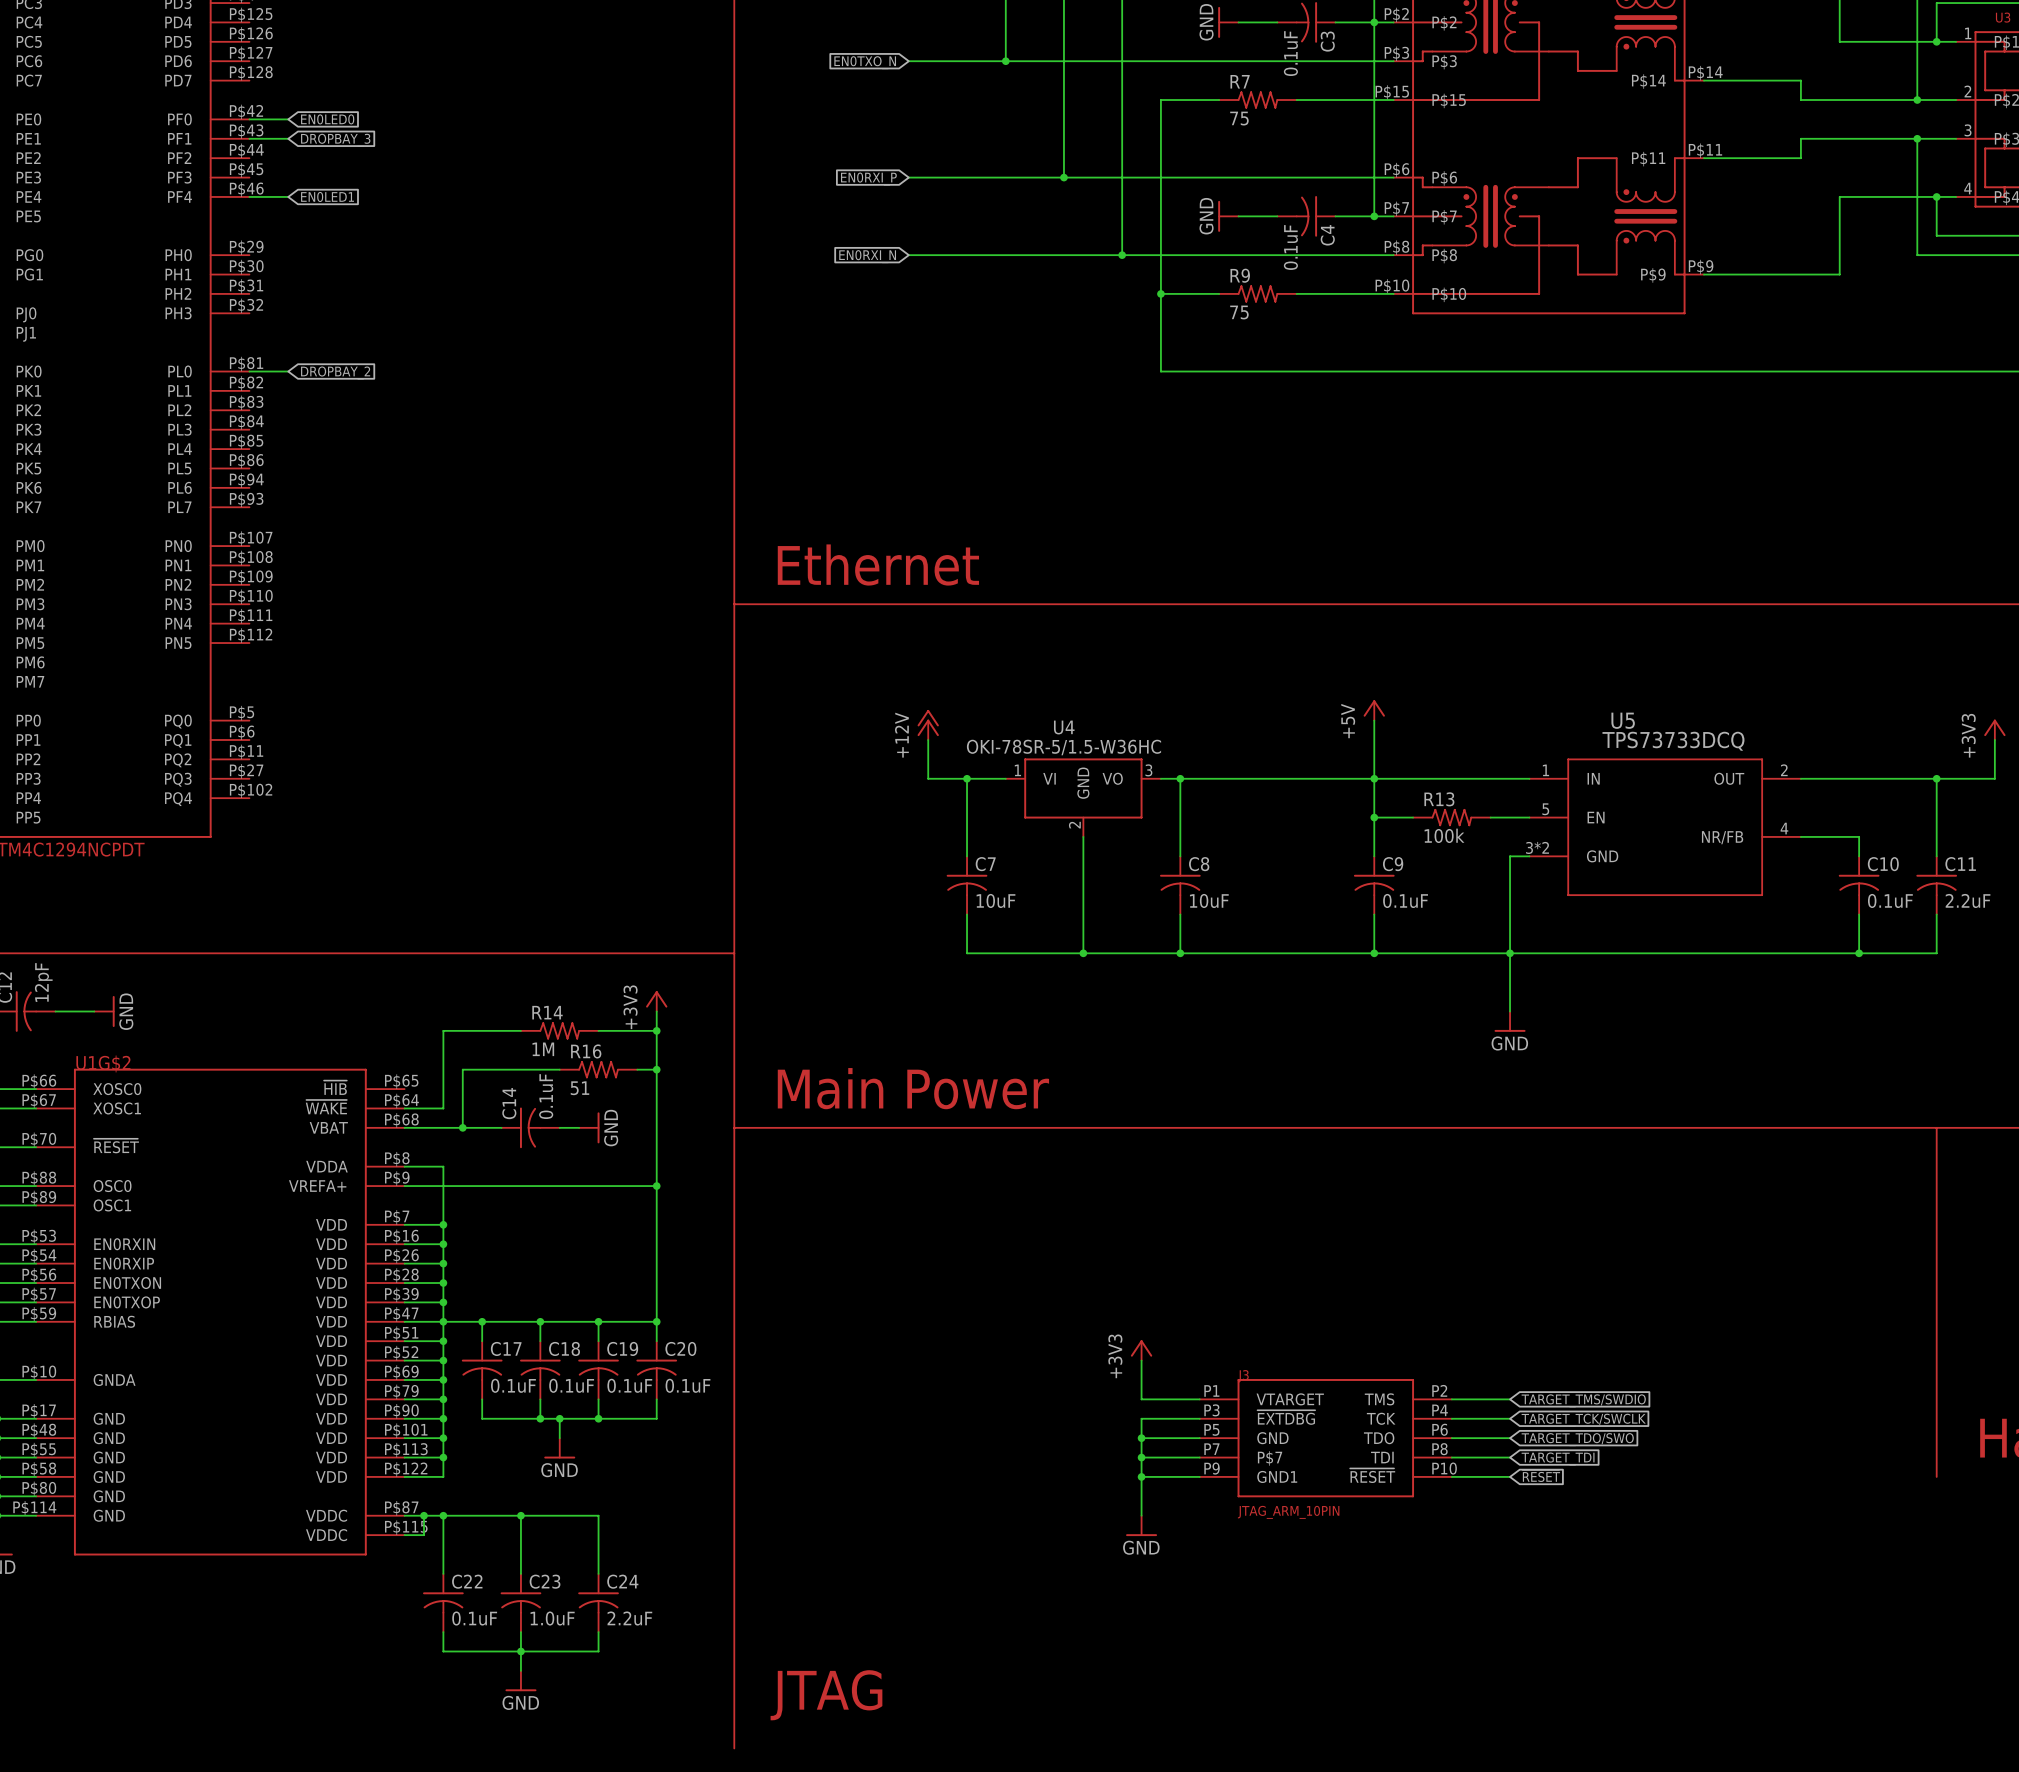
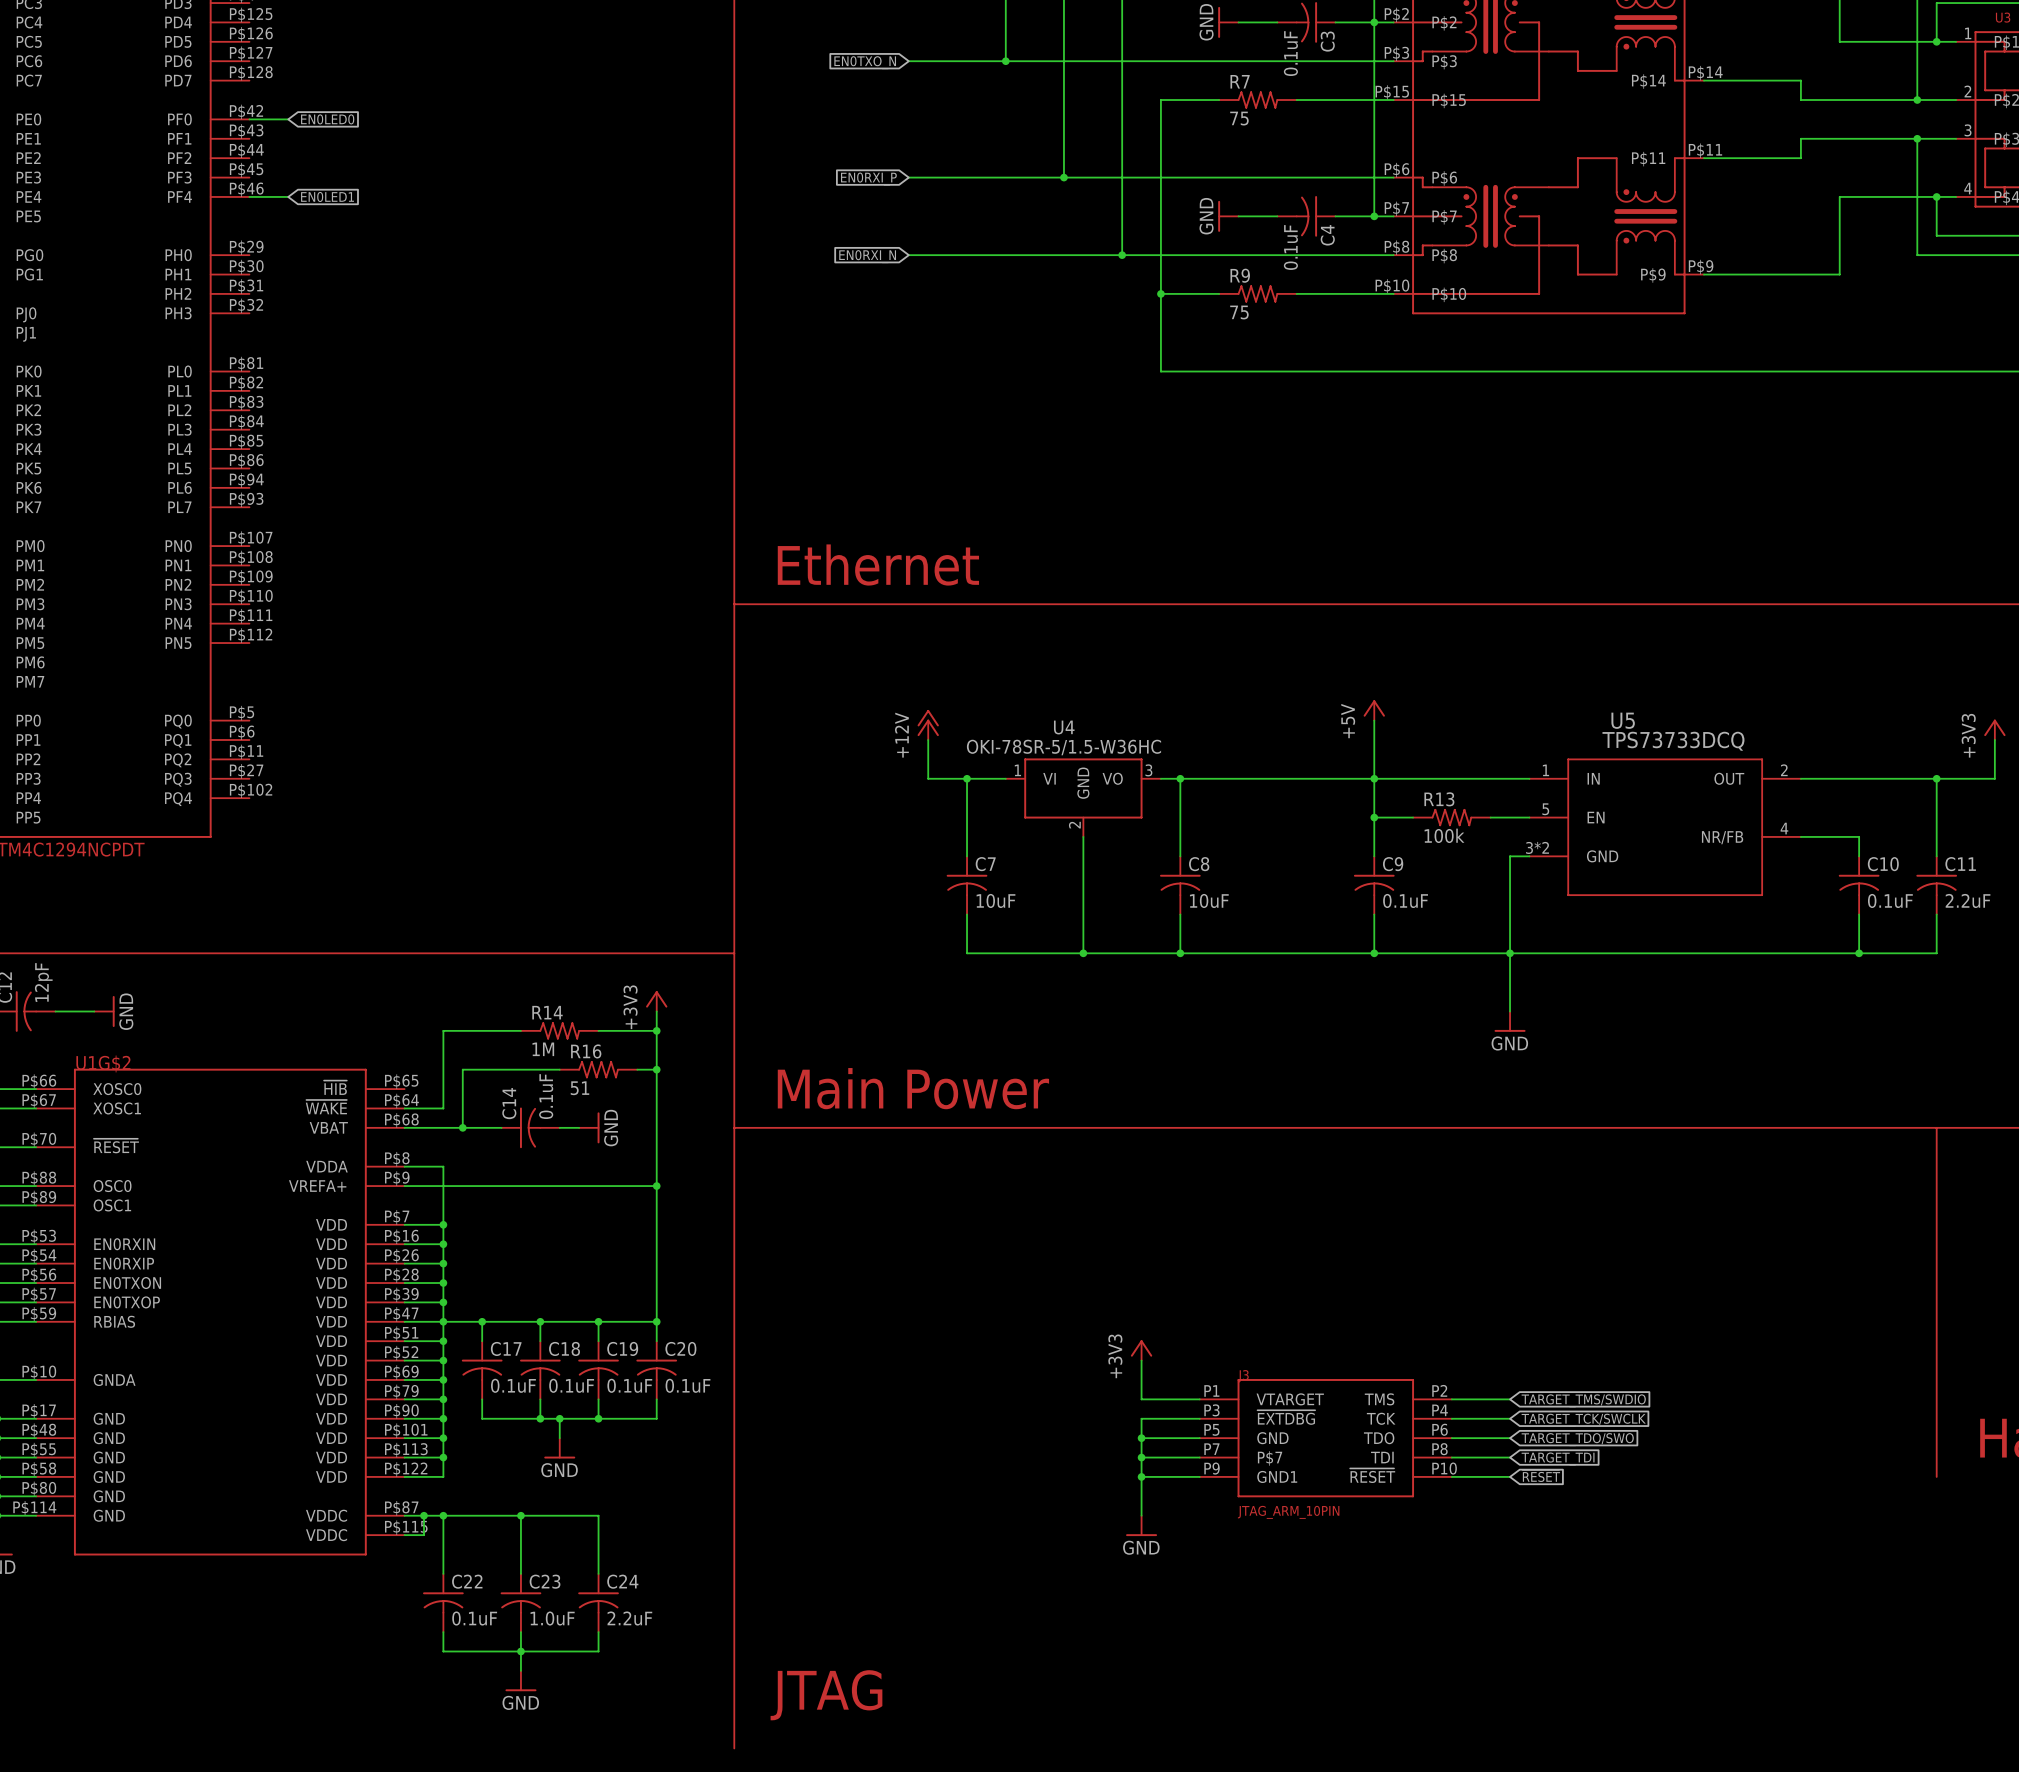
wire: (249, 138) (288, 138) -> none
global label: DROPBAY_3 (335, 140) -> none
wire: (249, 371) (288, 371) -> none
global label: DROPBAY_2 (335, 372) -> none

